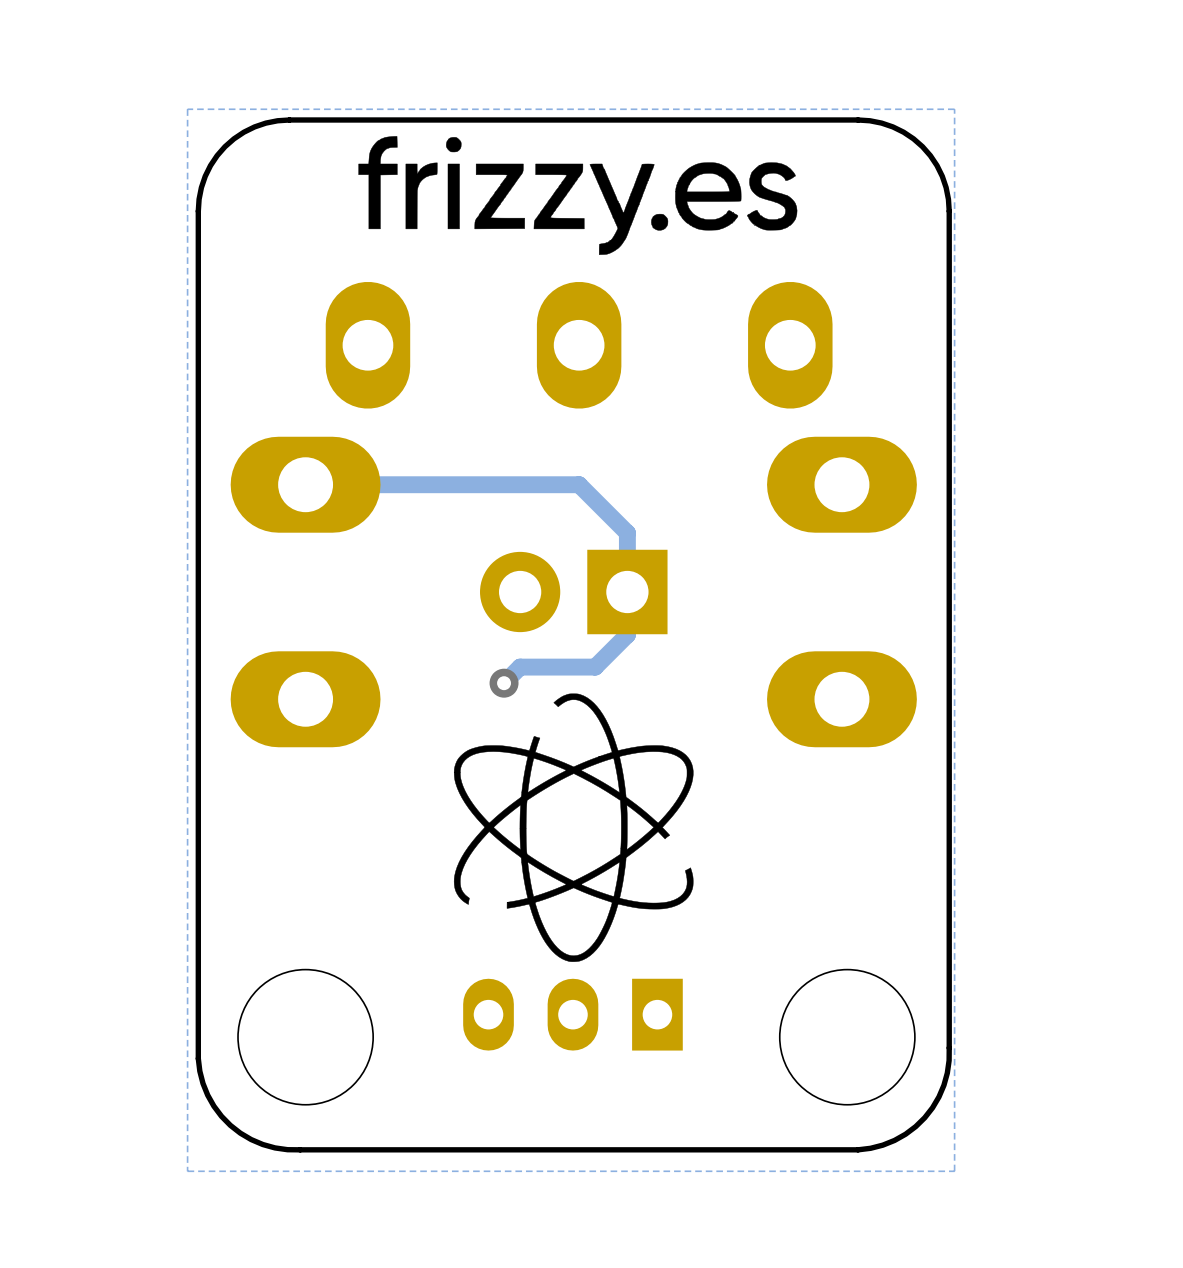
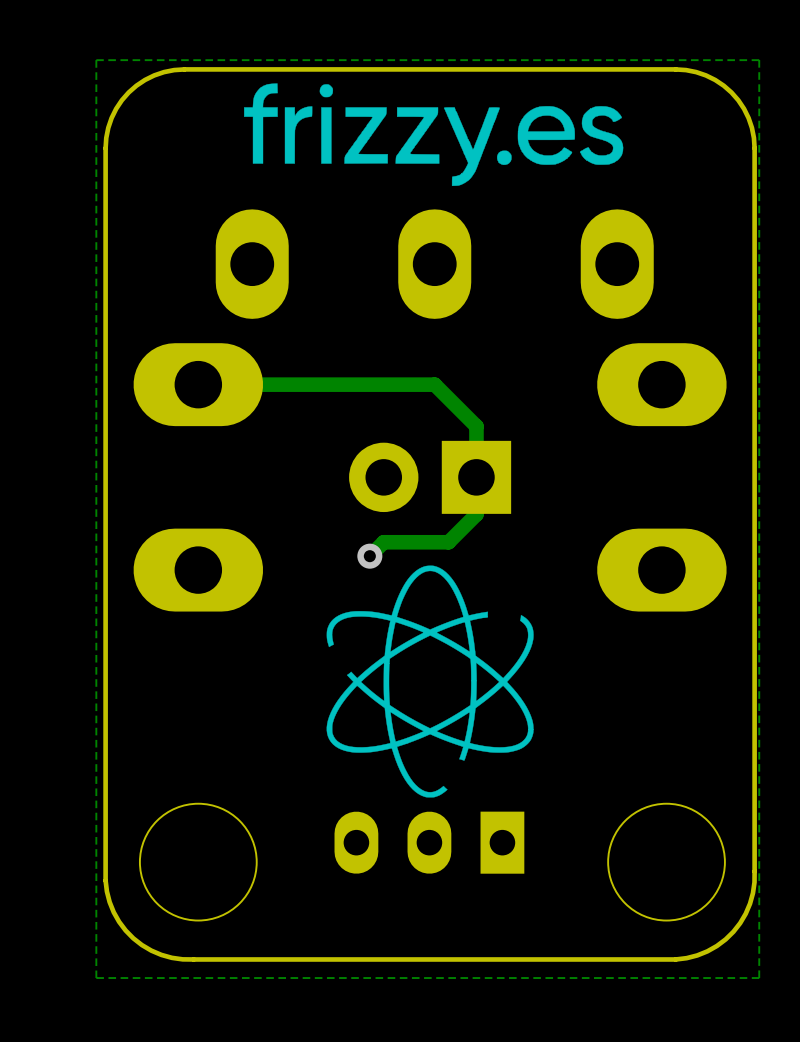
drawing shape: [453, 693, 694, 962] -> [326, 565, 534, 798]

